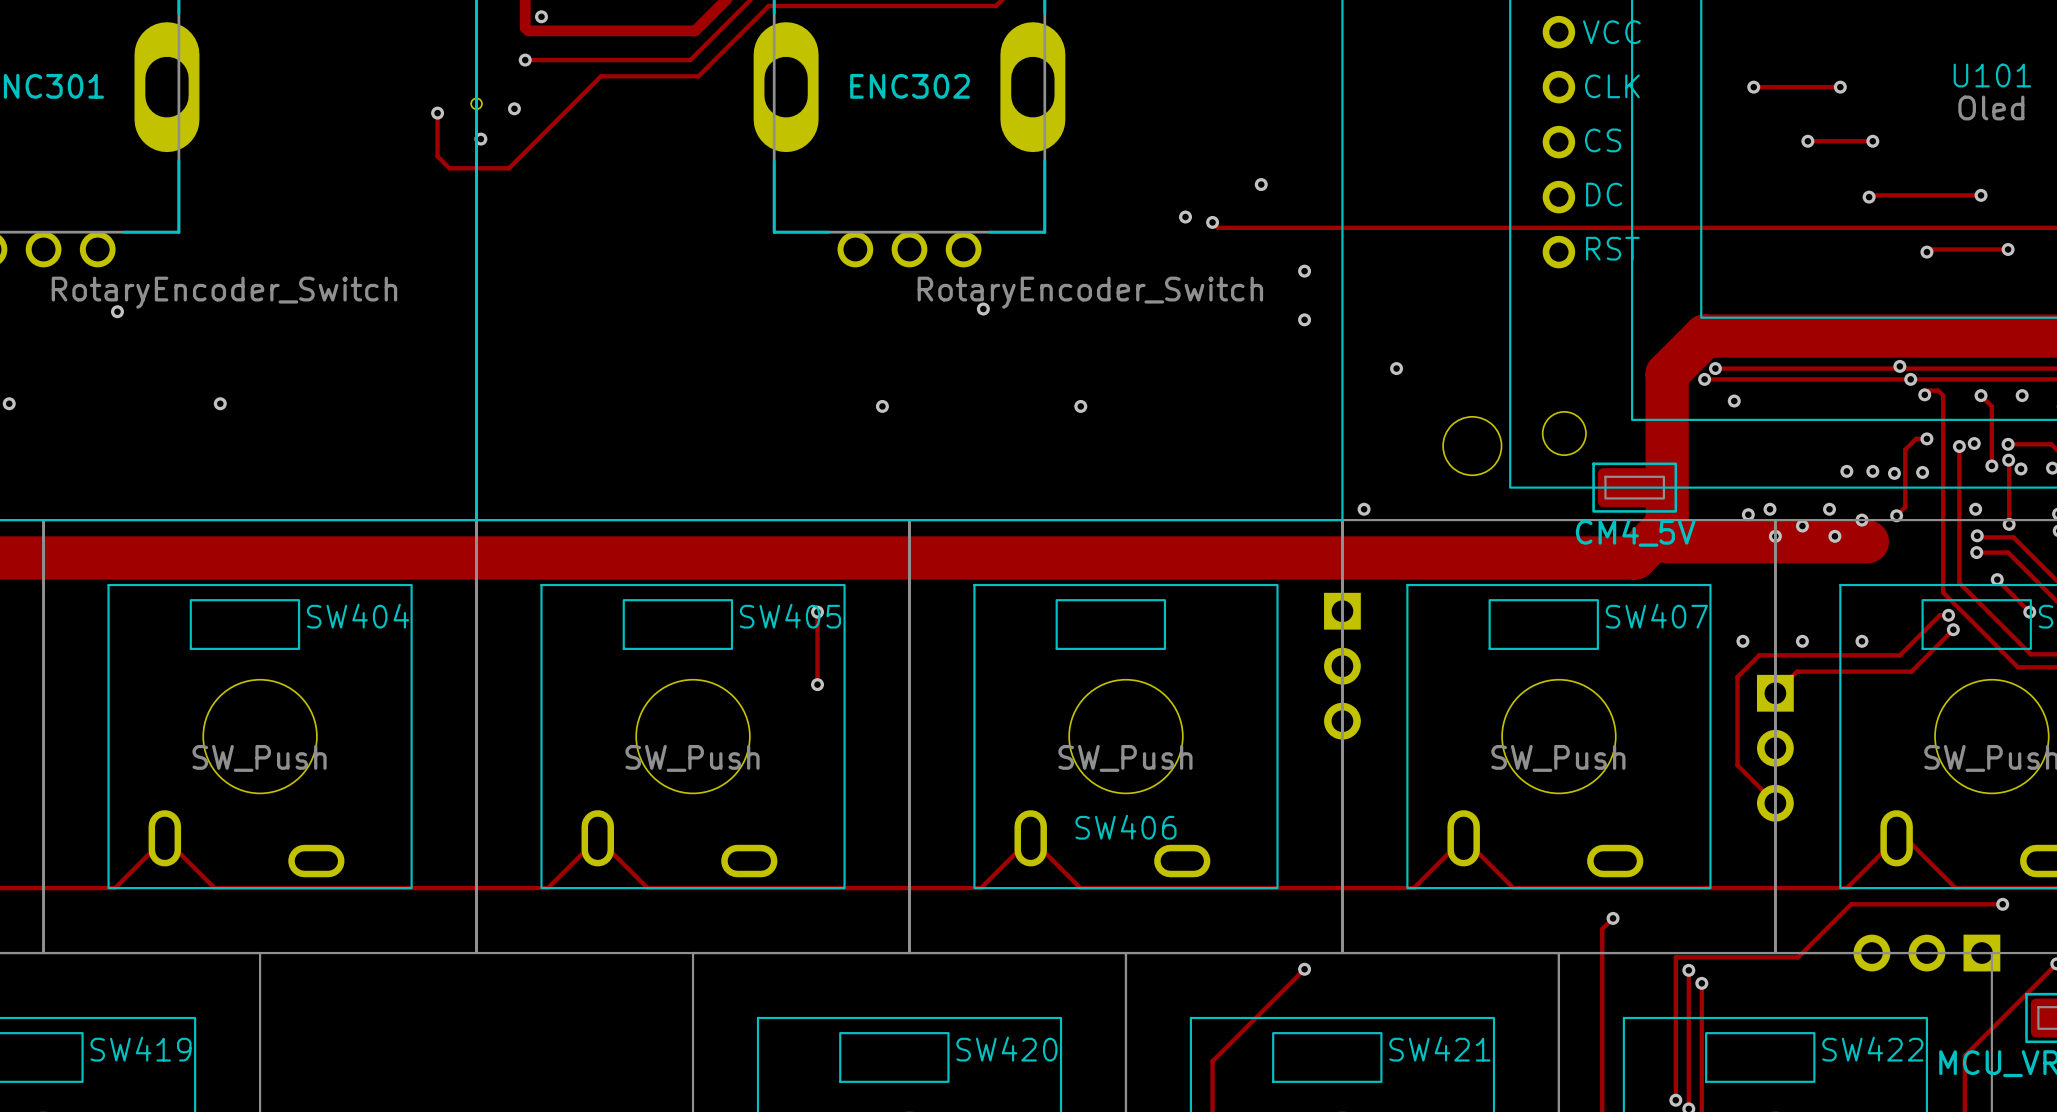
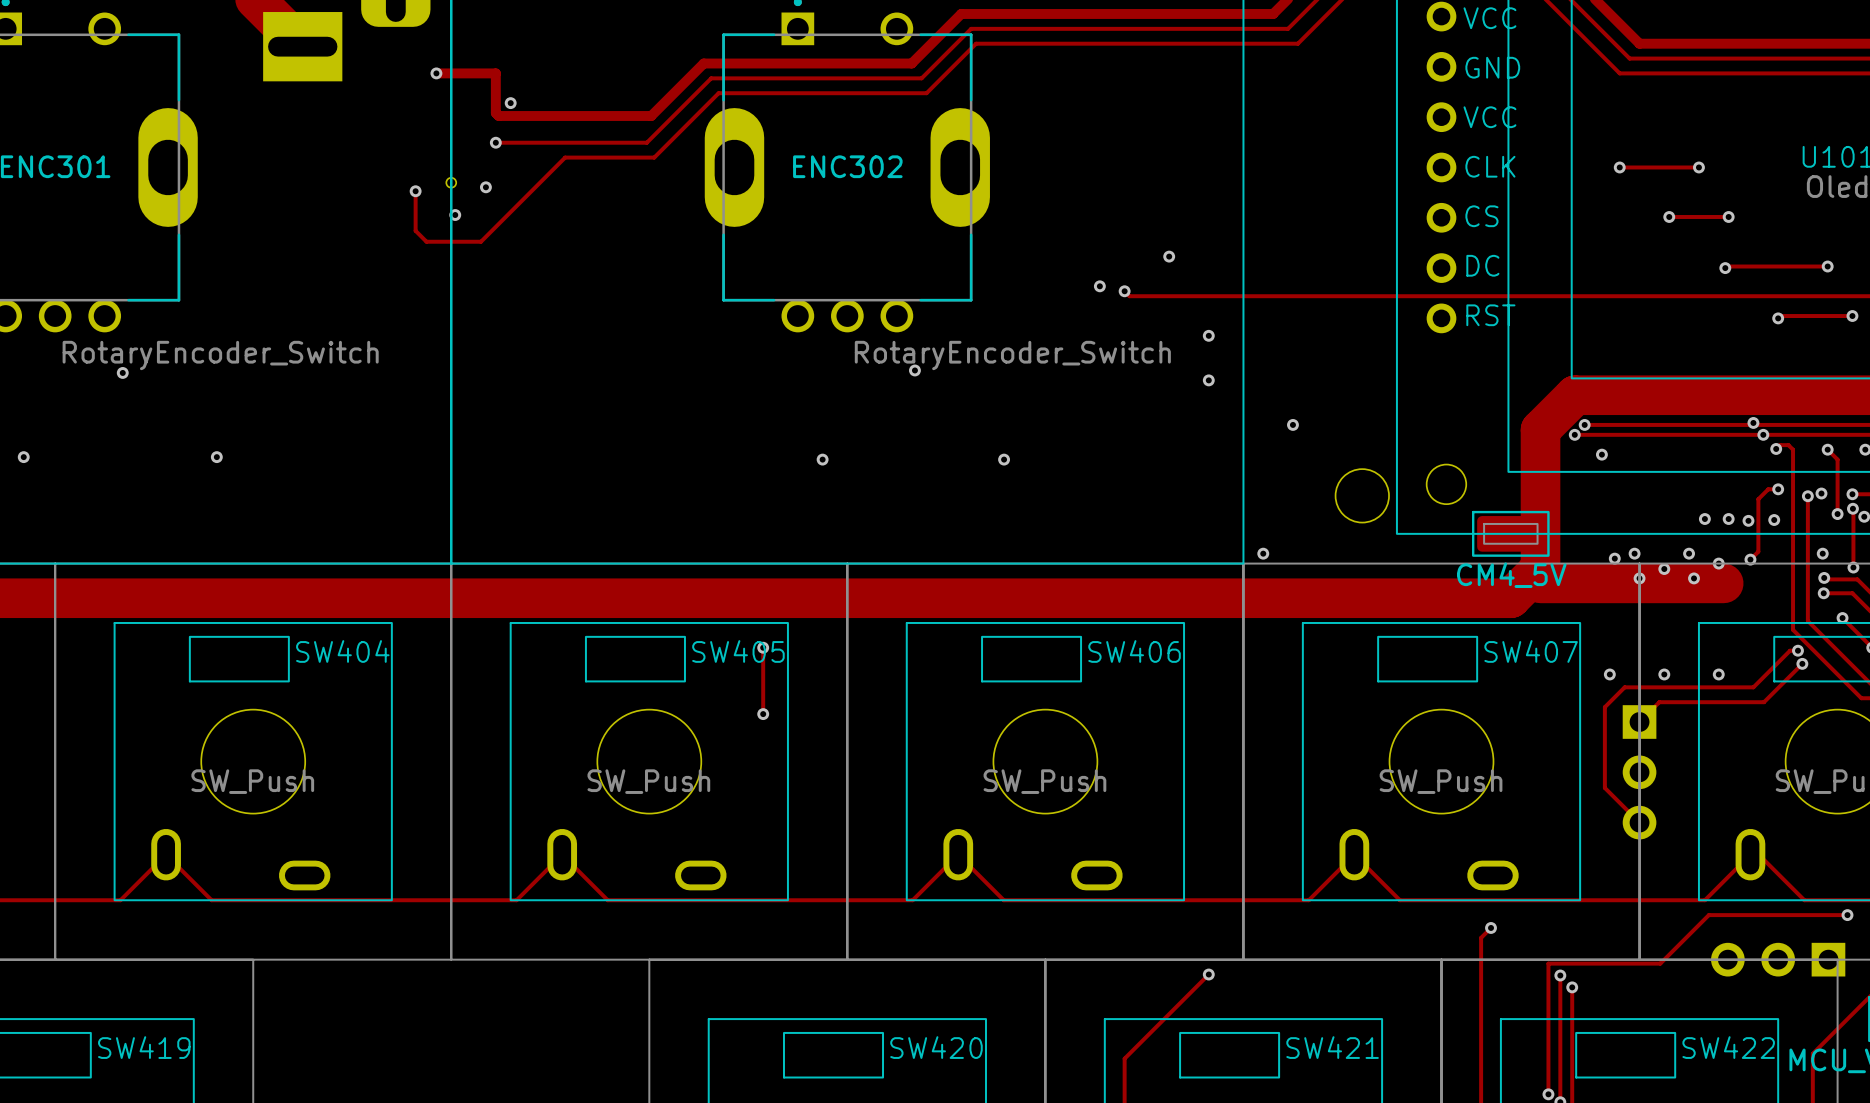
part: (1342, 666) -> none
SW406 name position: SW406 (1125, 827) -> SW406 (1134, 651)

